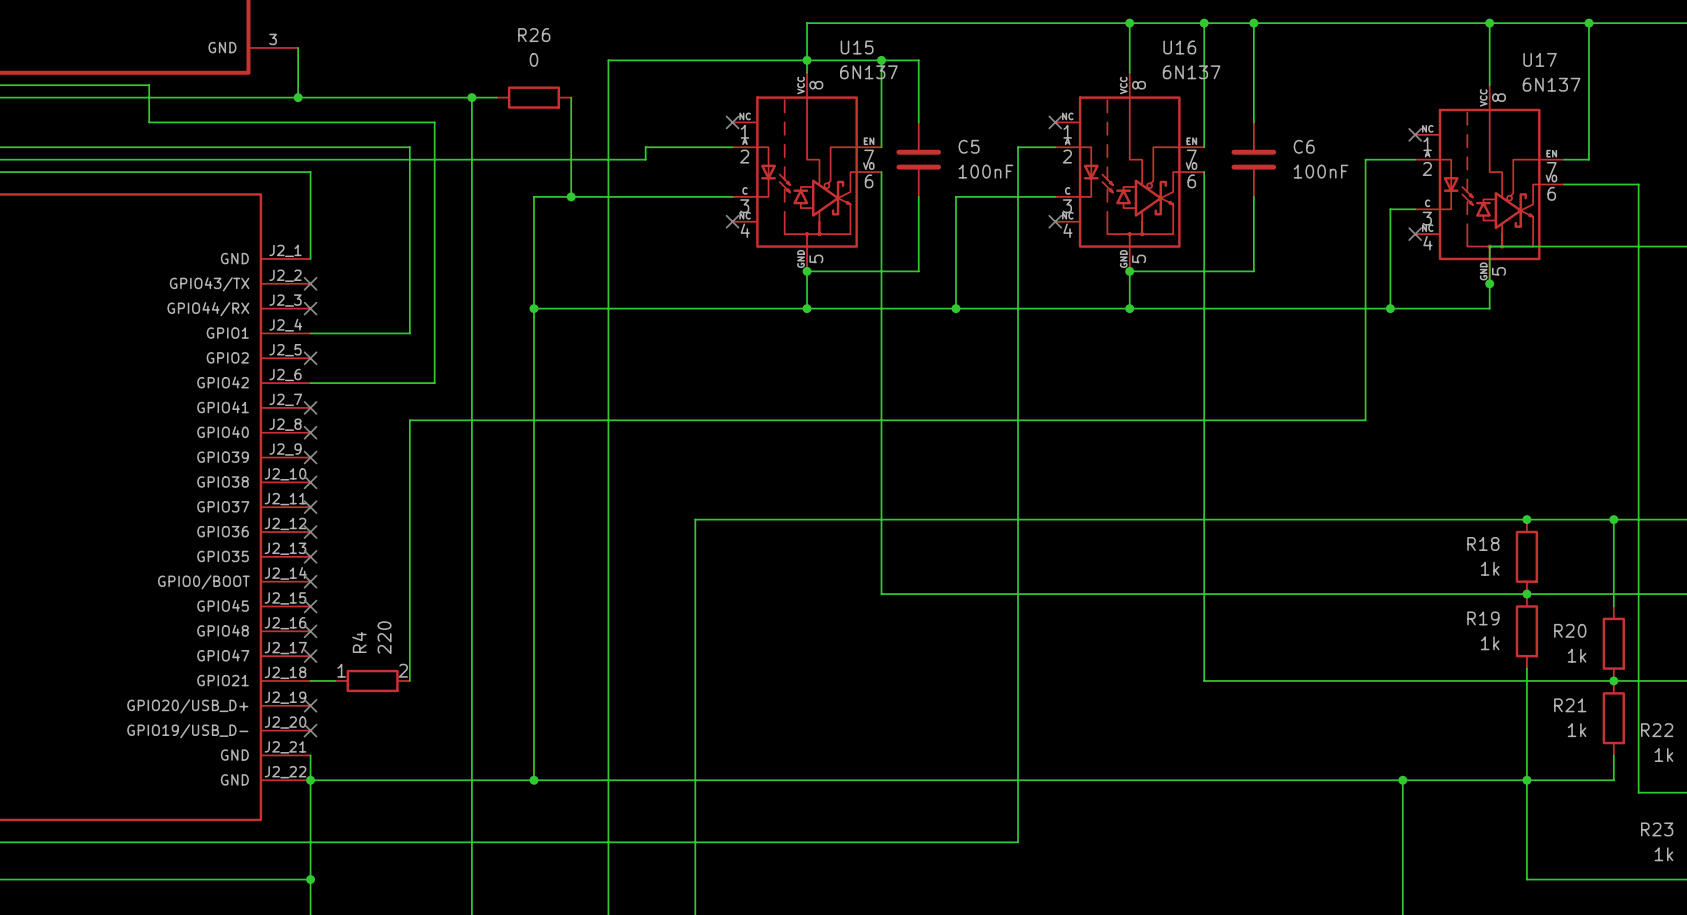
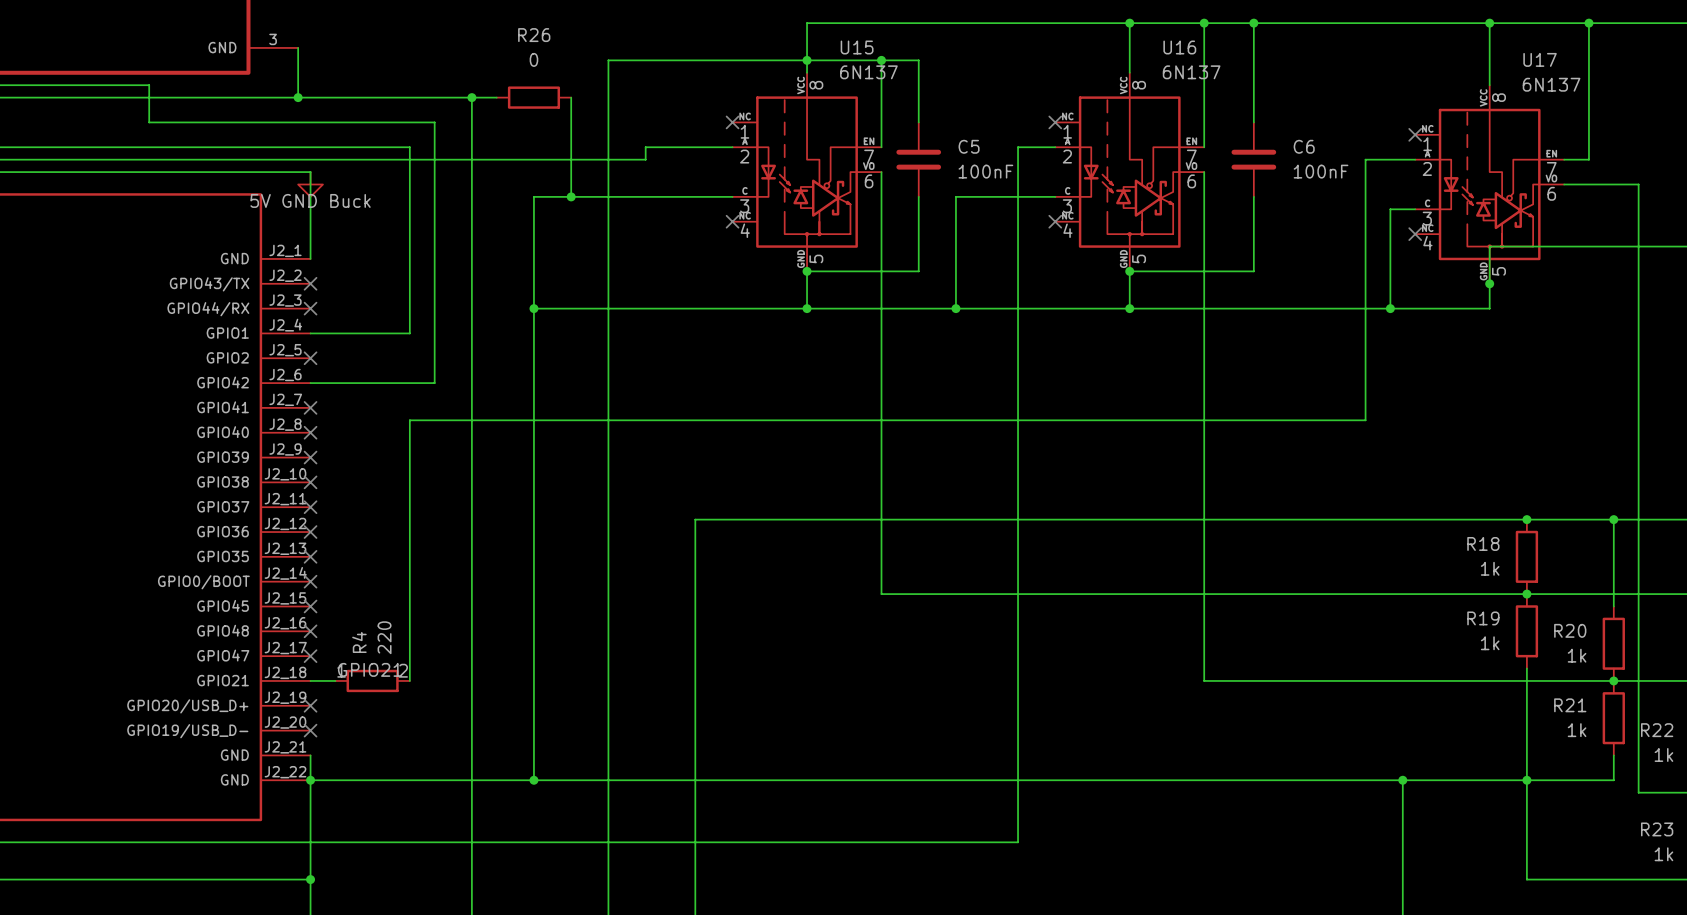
power symbol: none -> 5V GND Buck (310, 184)
label: none -> GPIO21 (370, 669)

